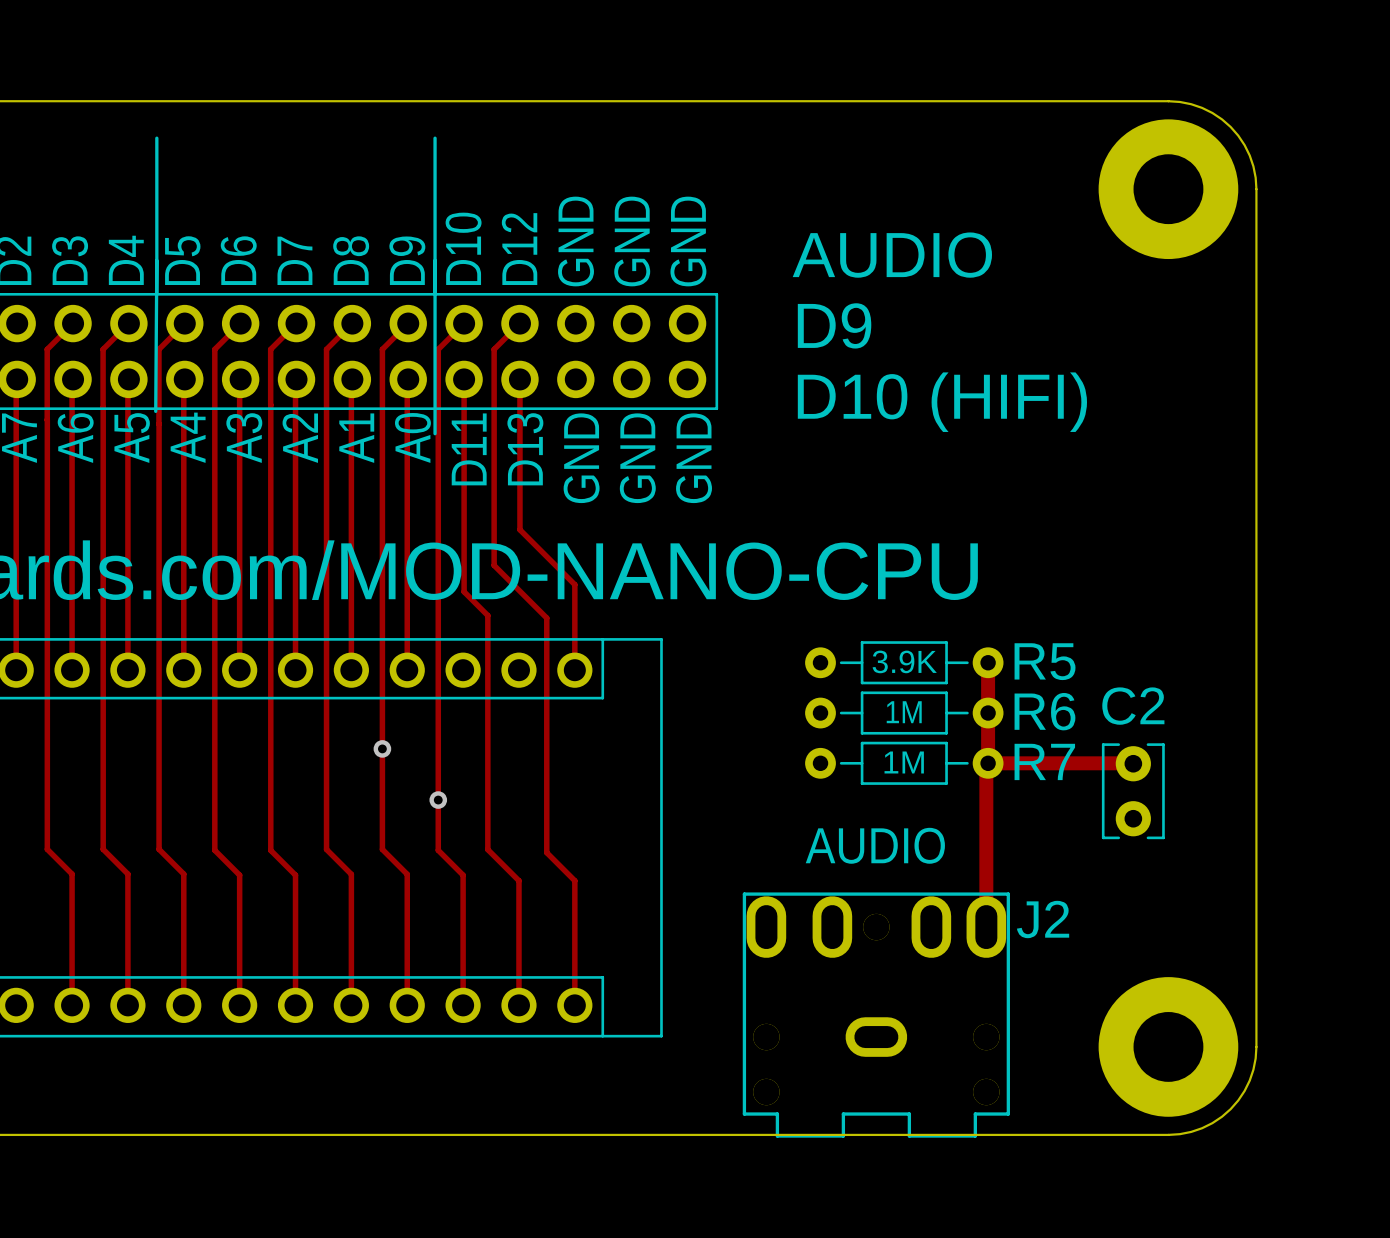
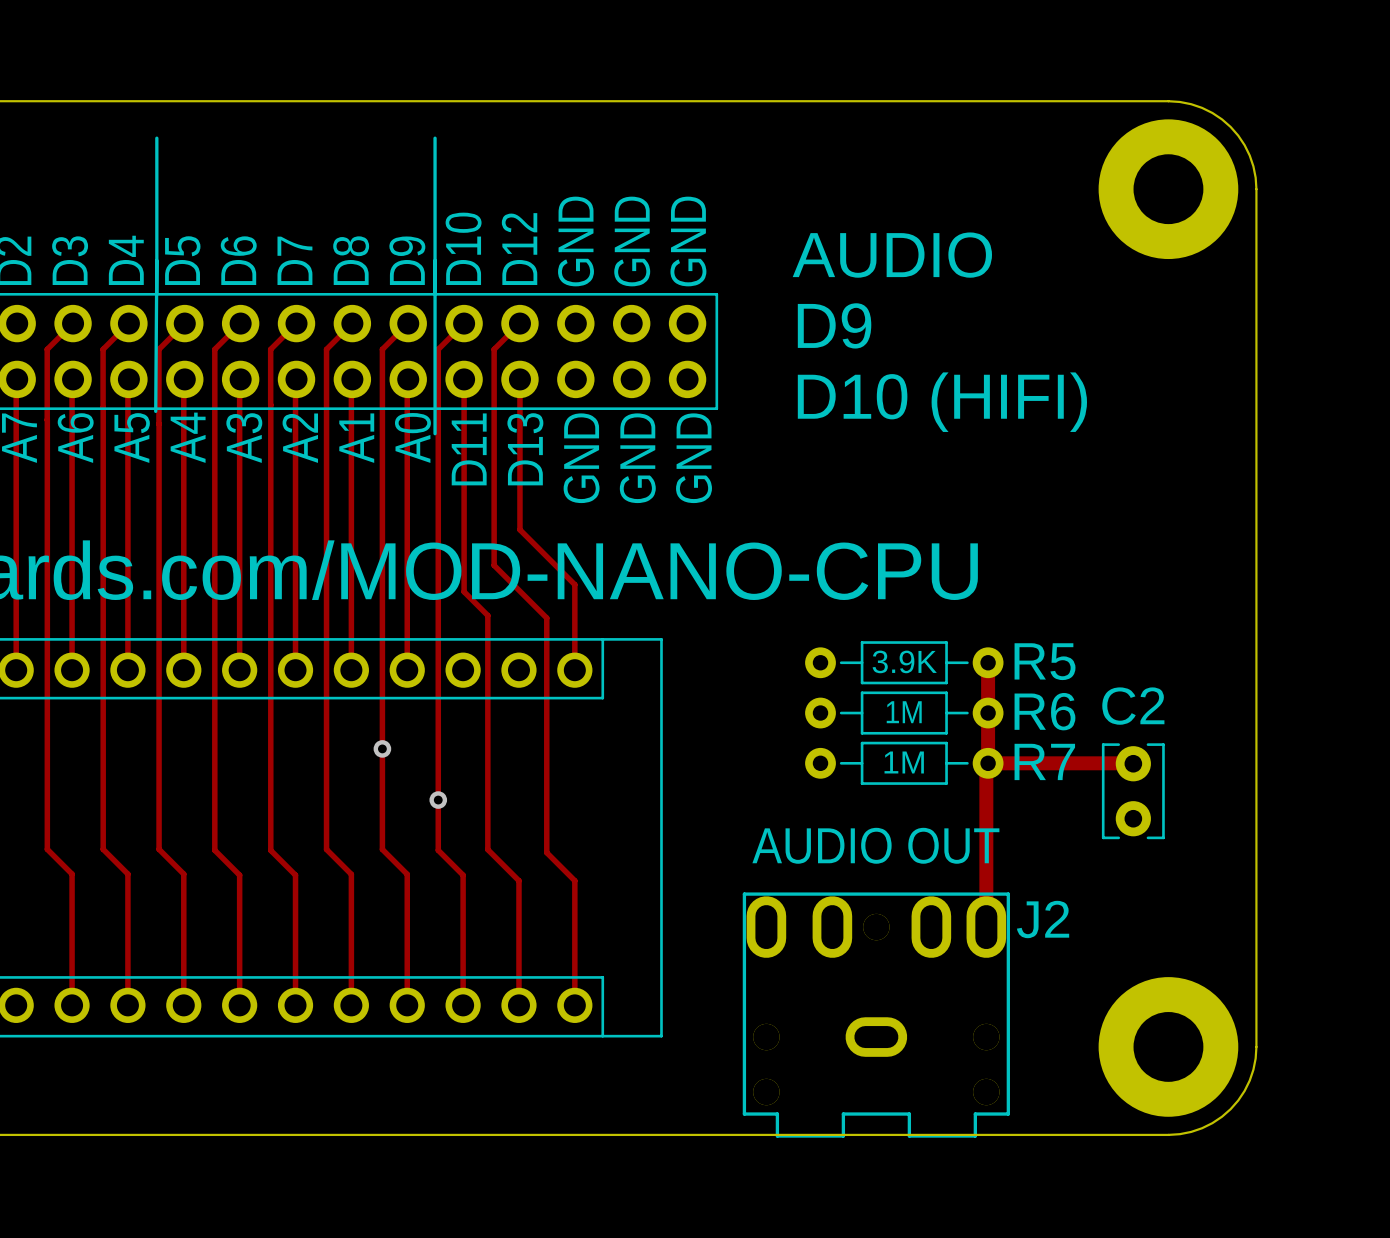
text: AUDIO (875, 845) -> AUDIO OUT (875, 845)

